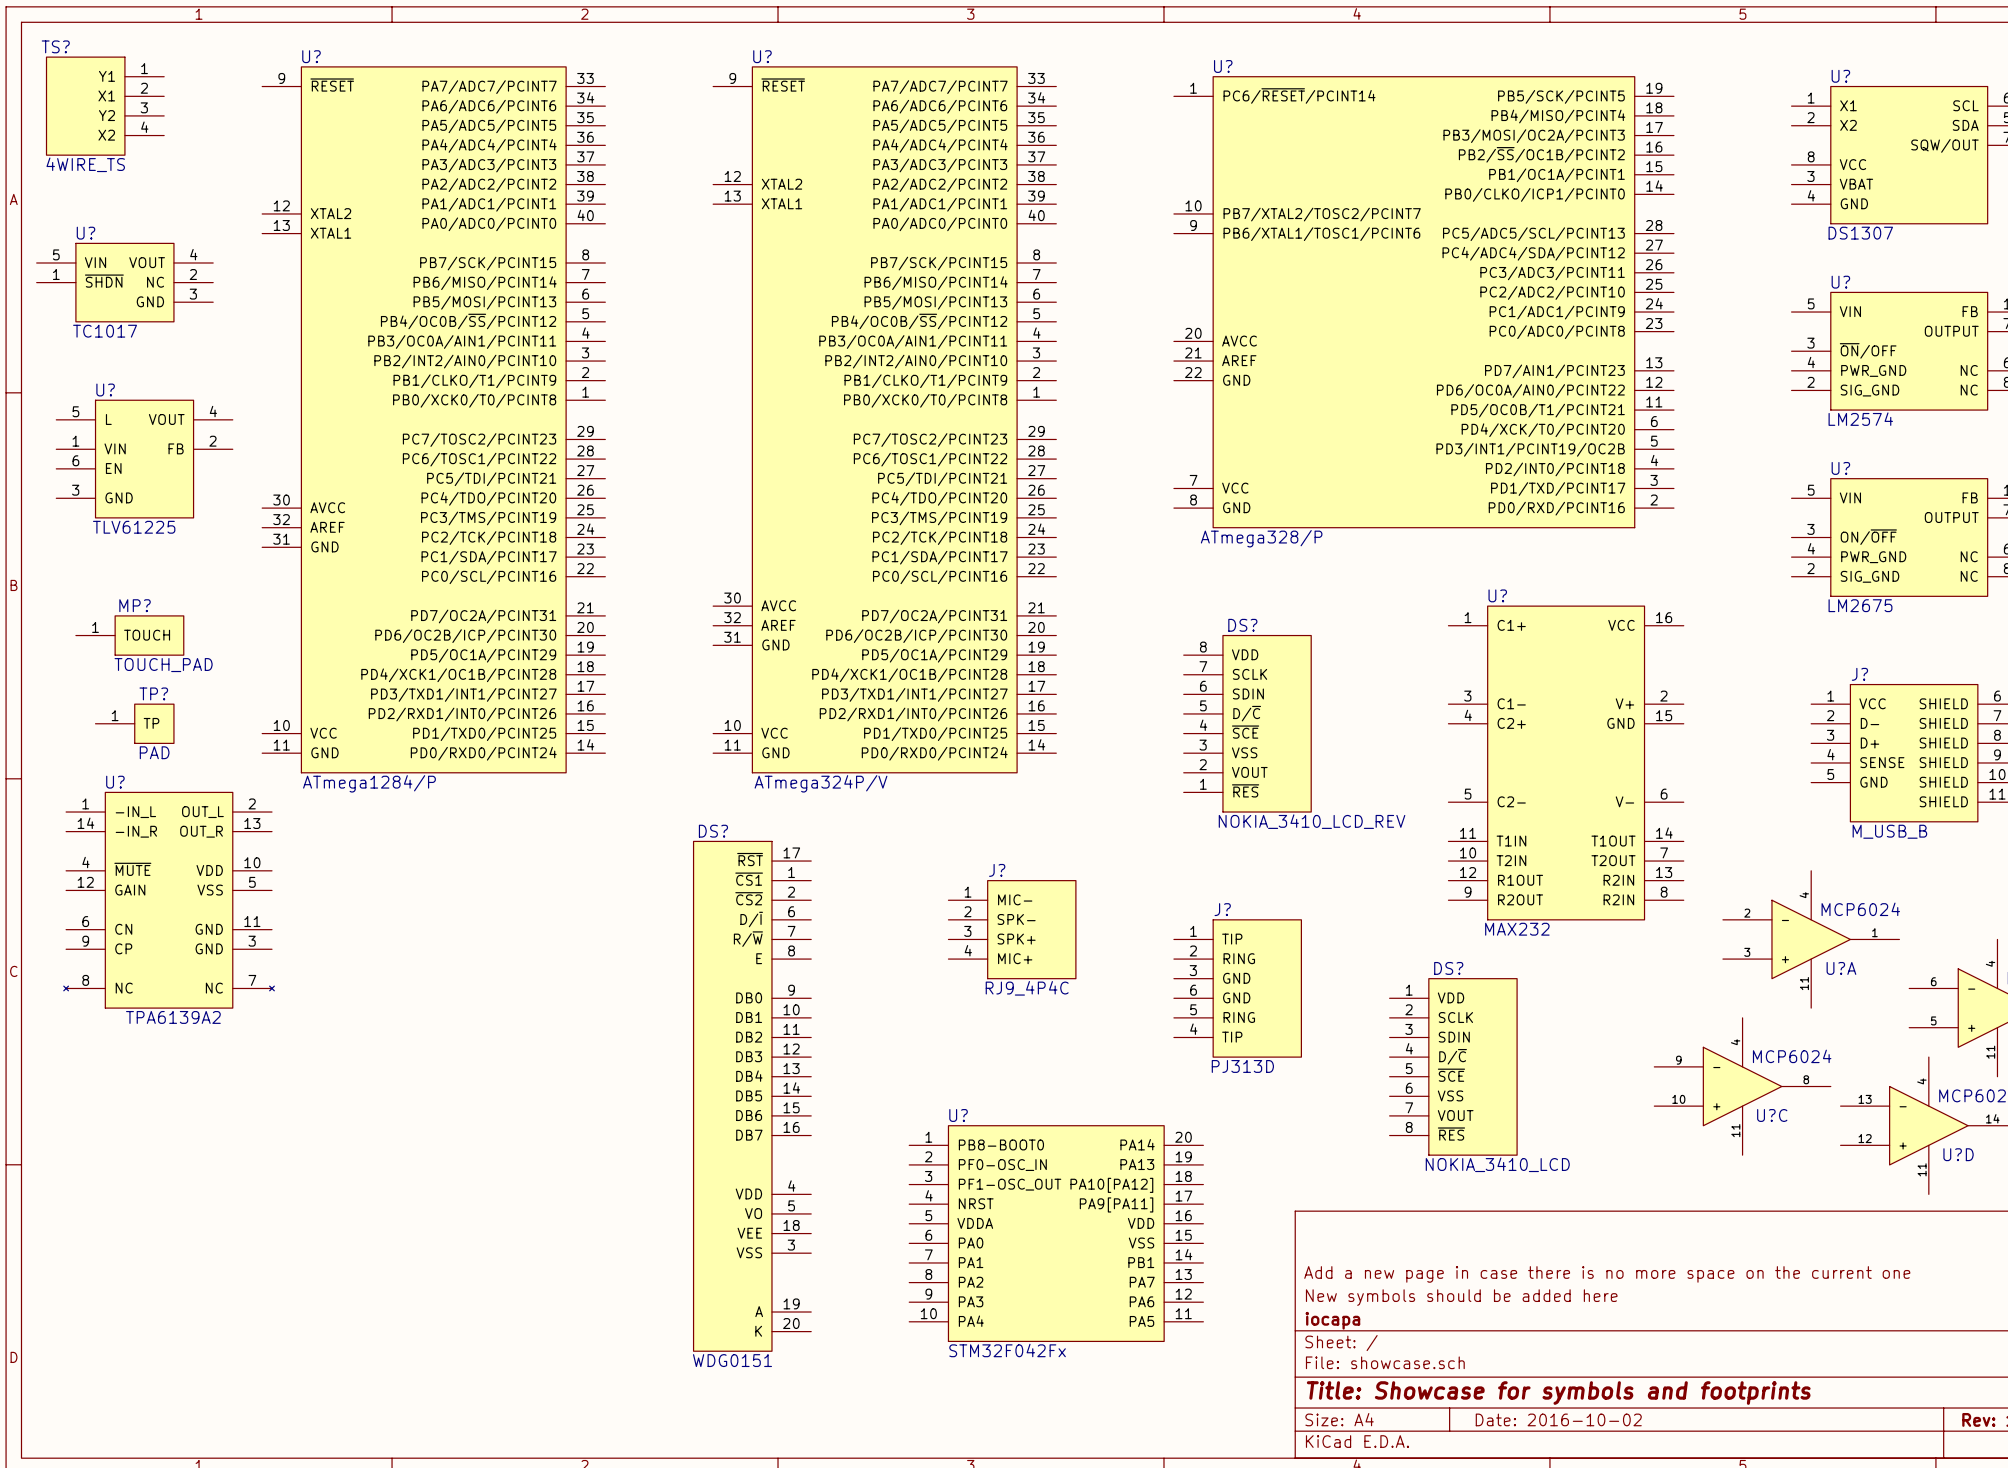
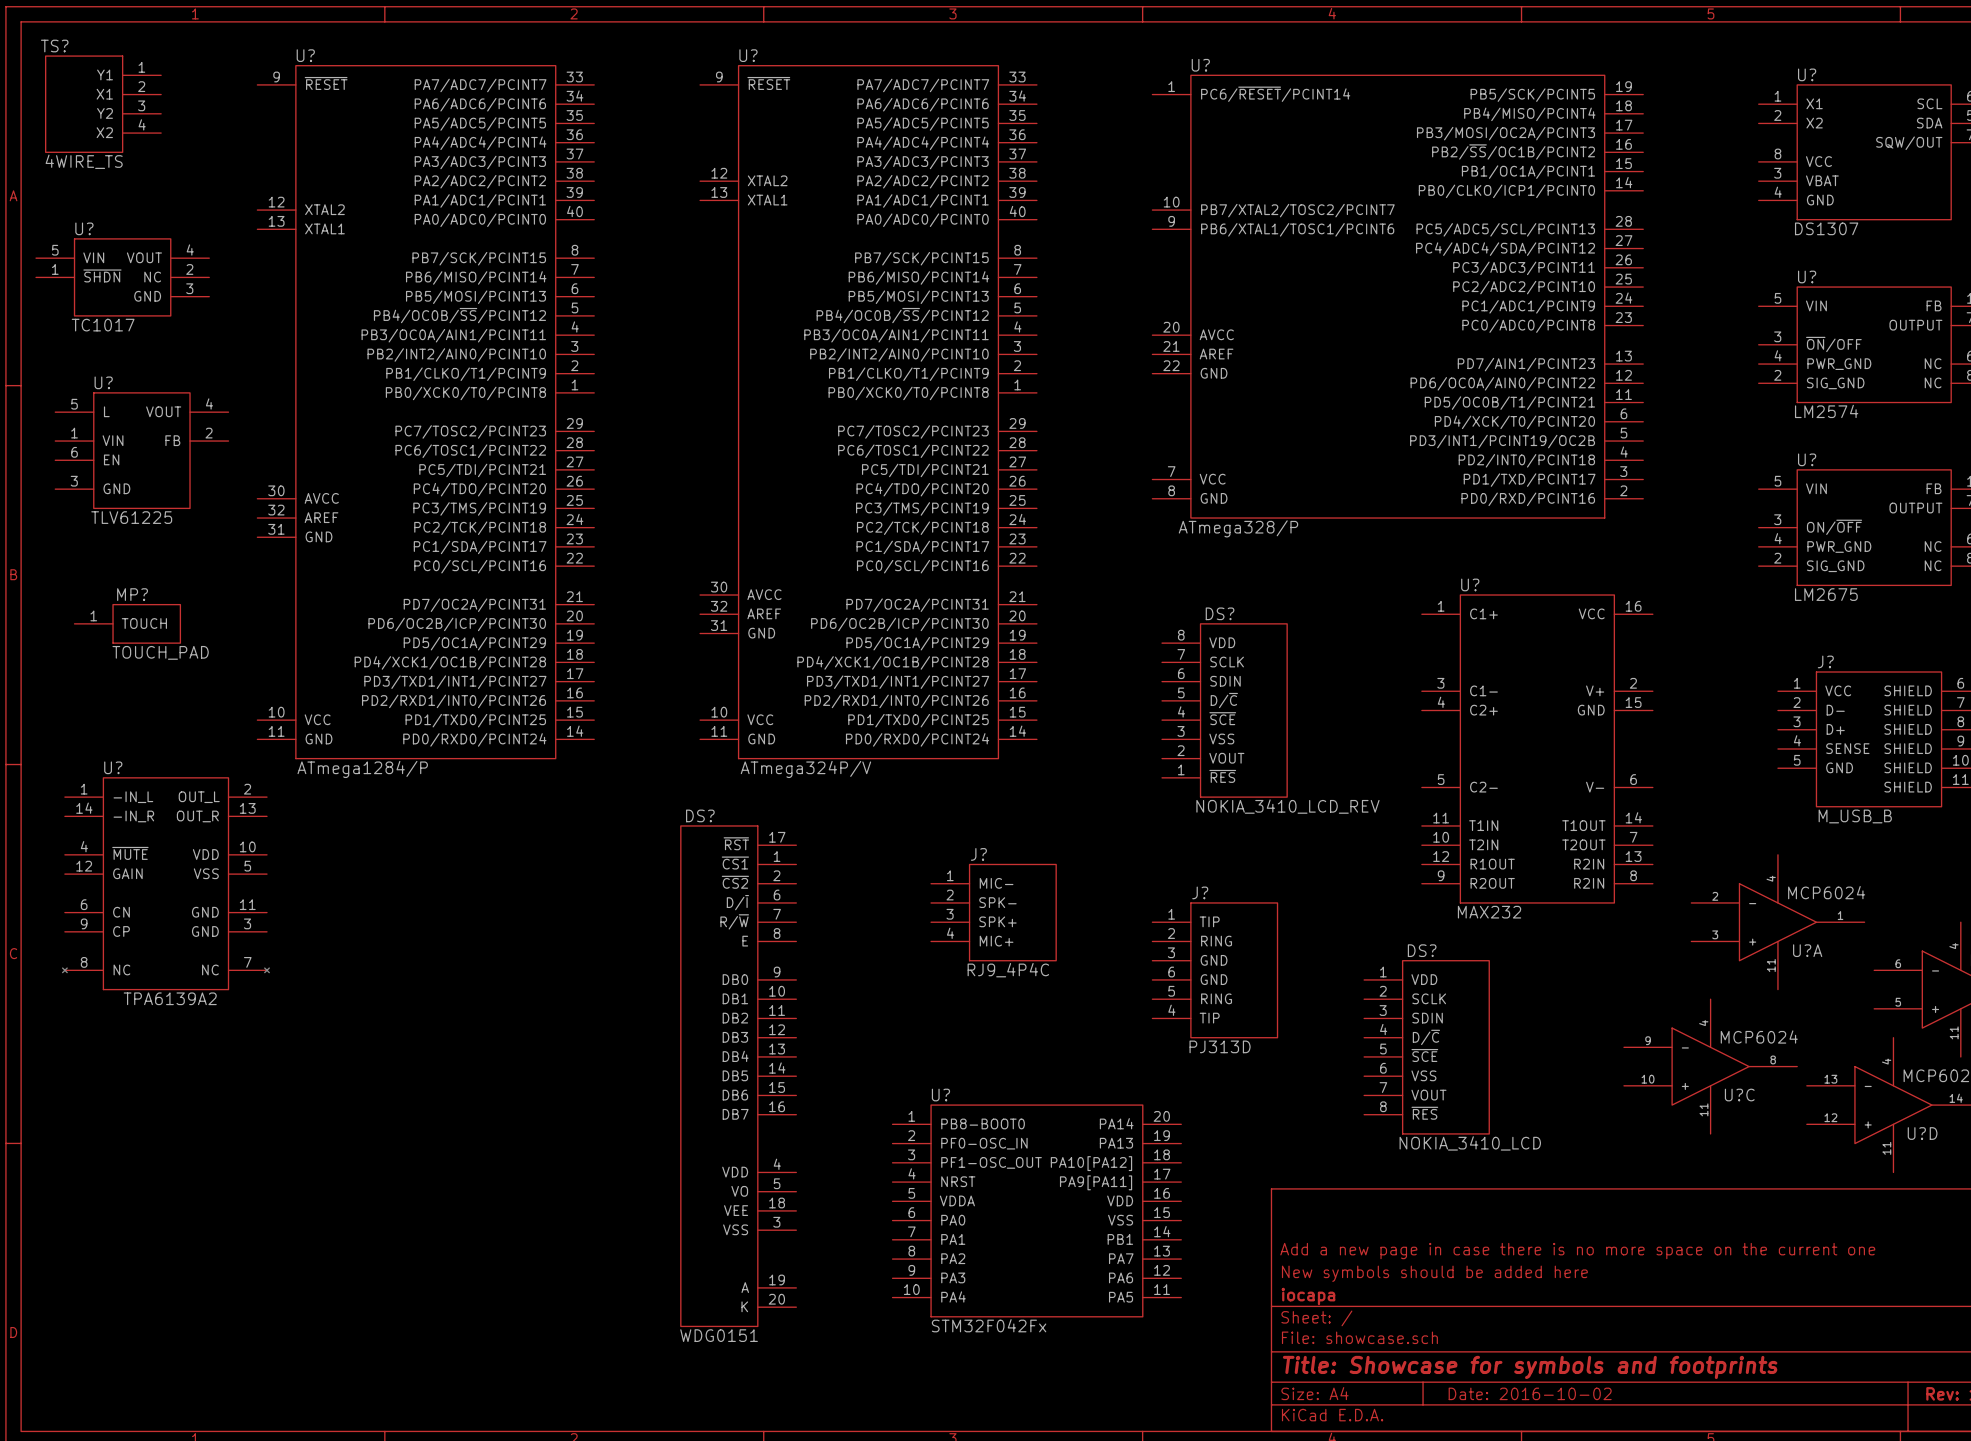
TP?: PAD (134, 723) -> none

